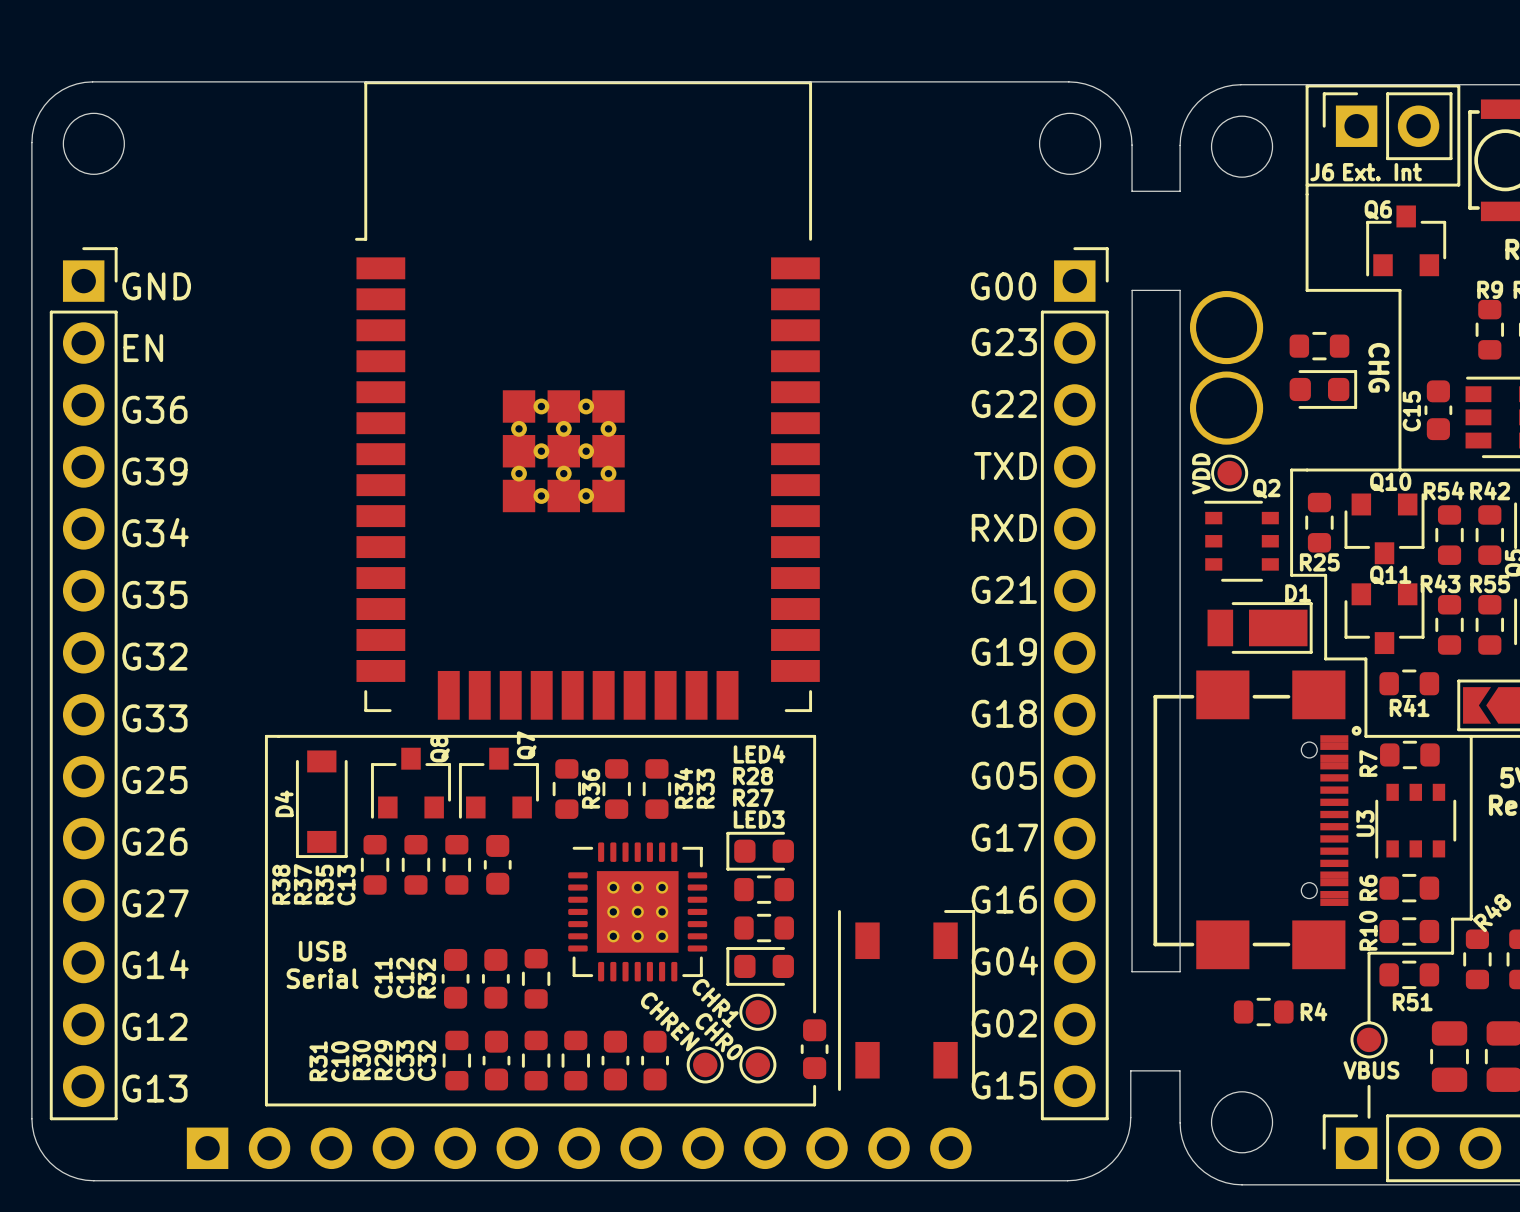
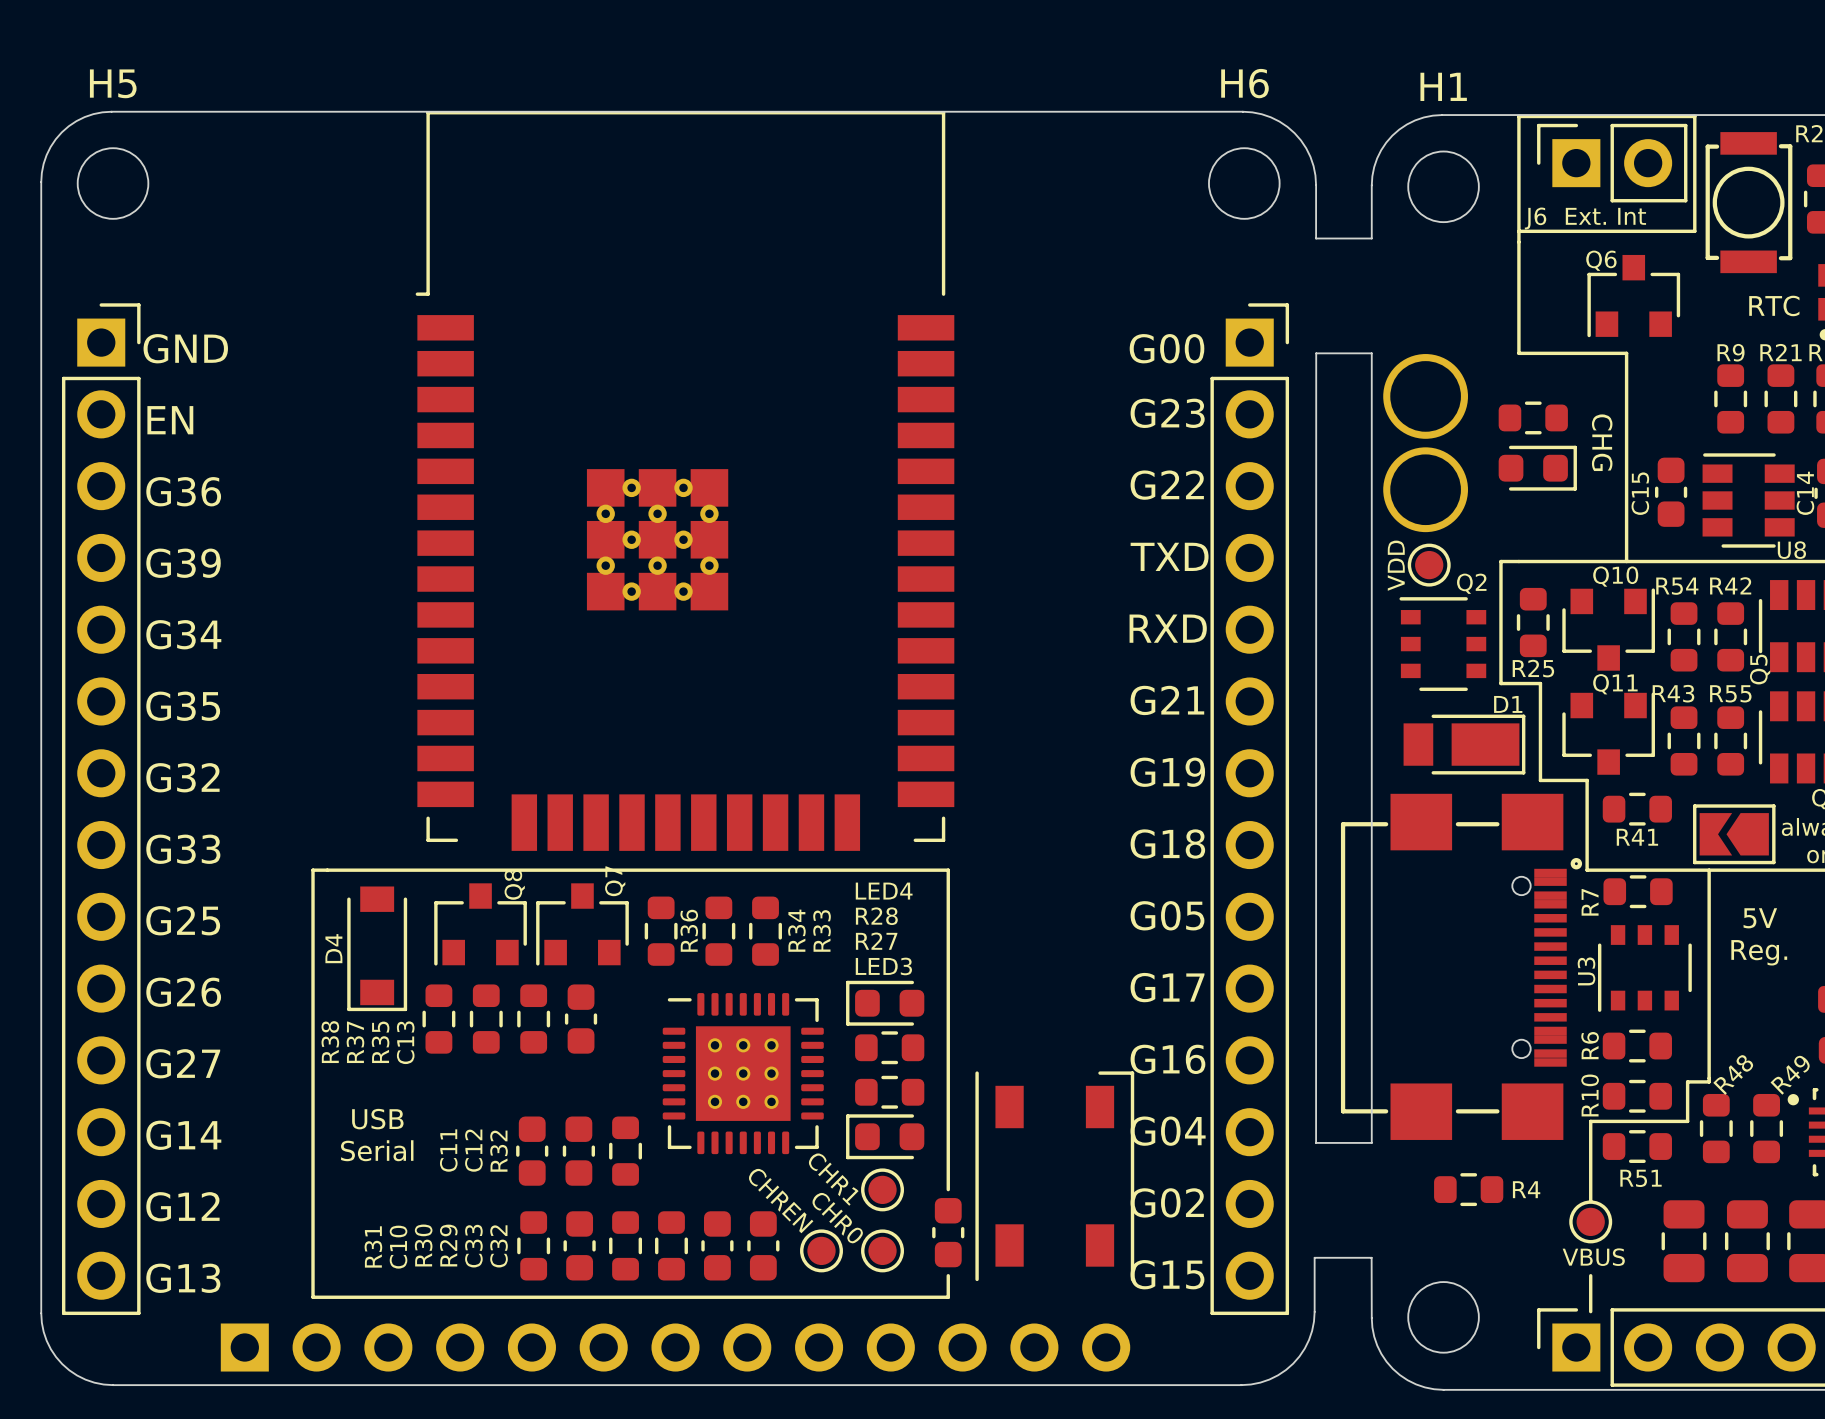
H5 name: none -> H5 (113, 83)
H6 name: none -> H6 (1244, 83)
H1 name: none -> H1 (1443, 86)

